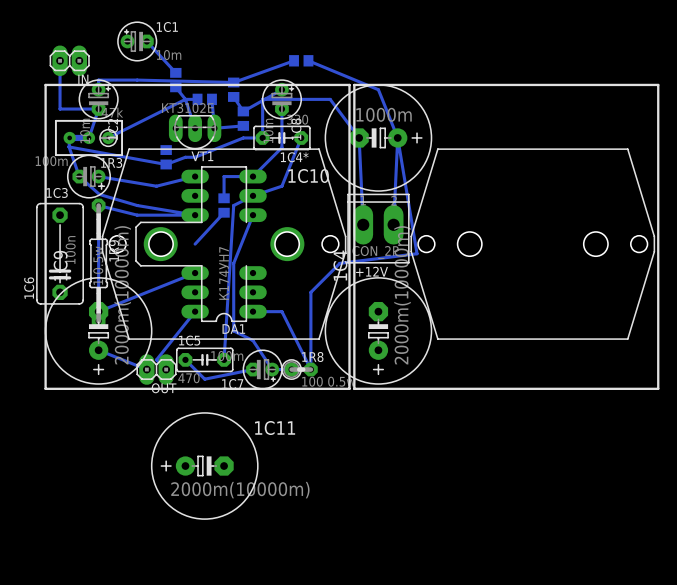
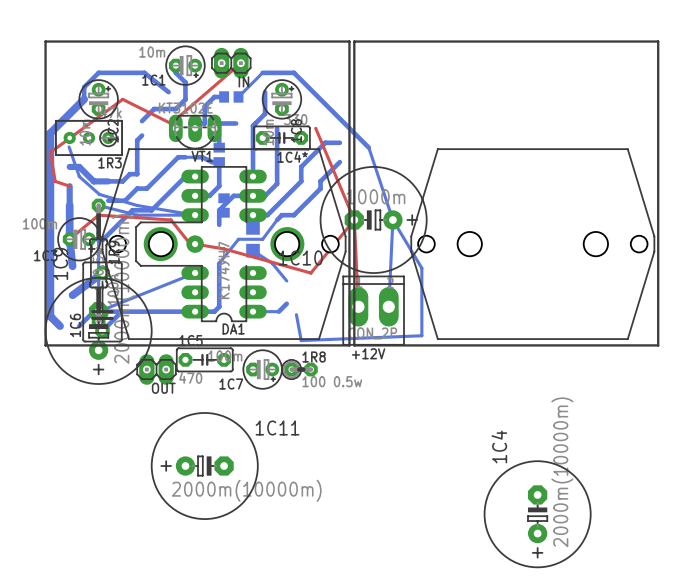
1C1 rotation: 0° (137, 41) -> 180° (185, 65)
1C1 position: (137, 41) -> (185, 65)
bottom track: (146, 41) (175, 72) -> none
bottom track: (60, 60) (60, 109) (98, 109) (88, 137) (69, 137) (69, 146) (166, 164) (185, 157) -> (108, 200) (125, 200) (137, 188) (146, 188) (178, 157) (185, 157)
IN position: (69, 60) -> (231, 63)
bottom track: (294, 60) (233, 82) (98, 80) (98, 89) -> none
part: (301, 60) -> none
bottom track: (308, 60) (378, 89) (397, 137) -> none
top track: none -> (240, 63) (170, 123) (122, 99) (50, 152) (55, 181) (69, 186)
bottom track: none -> (175, 65) (175, 72) (185, 82) (185, 99) (175, 109) (154, 109) (142, 121)
part: (175, 80) -> none
bottom track: (175, 87) (185, 99) -> none
part rotation: 0° (233, 89) -> 90° clockwise (231, 96)
bottom track: (281, 89) (243, 111) (233, 96) -> none
bottom track: none -> (168, 92) (144, 72) (98, 72) (84, 87) (84, 99) (50, 133) (50, 316) (60, 326)
bottom track: none -> (265, 92) (265, 113) (253, 125) (253, 176)
bottom track: none -> (224, 96) (214, 96) (204, 106) (204, 123) (190, 123)
bottom track: none -> (238, 96) (262, 72) (294, 72) (368, 147) (392, 219)
bottom track: (185, 99) (197, 99) -> none
bottom track: (185, 99) (108, 137) -> none
bottom track: (185, 99) (195, 128) -> none
part: (204, 99) -> none
bottom track: (211, 99) (214, 128) (243, 125) -> none
bottom track: (281, 109) (281, 147) (253, 176) (224, 176) (224, 198) -> none
part: (243, 118) -> none
bottom track: none -> (236, 123) (219, 123) (219, 147)
bottom track: none -> (277, 128) (277, 183) (265, 195) (233, 195) (219, 210) (219, 224)
top track: none -> (315, 128) (354, 219)
bottom track: none -> (142, 135) (137, 140) (137, 174) (129, 174) (122, 181) (93, 181) (79, 166) (69, 166)
bottom track: (301, 137) (281, 186) (253, 195) (233, 205) (224, 359) -> none
1C10 position: (378, 137) -> (373, 219)
bottom track: (397, 137) (417, 253) (339, 263) (310, 292) (310, 369) (281, 311) (278, 311) -> (286, 303) (278, 311)
bottom track: (397, 137) (393, 224) -> (392, 219) (388, 306)
bottom track: none -> (339, 142) (325, 142) (301, 166) (301, 181) (267, 215) (253, 215) (253, 227)
part: none -> (219, 154)
part: (166, 157) -> none
bottom track: (195, 157) (243, 137) (262, 137) (262, 99) (330, 99) (359, 137) (363, 224) -> (195, 157) (219, 162) (219, 186) (209, 195) (195, 195)
bottom track: none -> (339, 162) (320, 181) (320, 188) (294, 215) (281, 215) (262, 239) (238, 239) (219, 263) (219, 306) (214, 311) (93, 311) (79, 326)
1C3 position: (88, 176) -> (79, 239)
bottom track: (98, 176) (156, 186) (195, 176) -> (88, 239) (103, 239) (132, 210) (151, 210) (185, 176) (195, 176)
bottom track: none -> (69, 186) (69, 239) (72, 266)
1C6 footprint: [36, 203, 84, 305] -> [82, 261, 123, 343]
bottom track: (224, 212) (195, 244) -> none
bottom track: (253, 215) (233, 263) (233, 330) (253, 340) (272, 369) (291, 369) -> none
top track: none -> (354, 219) (310, 273) (224, 248) (190, 244) (170, 219) (98, 215) (69, 239)
top track: none -> (354, 219) (358, 306)
bottom track: none -> (392, 219) (421, 268) (421, 335) (301, 340) (296, 314)
+12V position: (378, 228) -> (373, 310)
drawing position: (197, 236) -> (197, 193)
drawing position: (506, 236) -> (506, 193)
part: none -> (253, 239)
via: none -> (195, 244)
bottom track: none -> (253, 250) (272, 263) (286, 280)
bottom track: none -> (102, 273) (72, 295)
bottom track: none -> (121, 311) (102, 330)
bottom track: (195, 311) (156, 359) (166, 369) -> none
1C4 position: (378, 330) -> (537, 514)
bottom track: (98, 350) (146, 369) -> none
bottom track: (185, 359) (204, 379) (253, 369) -> none

